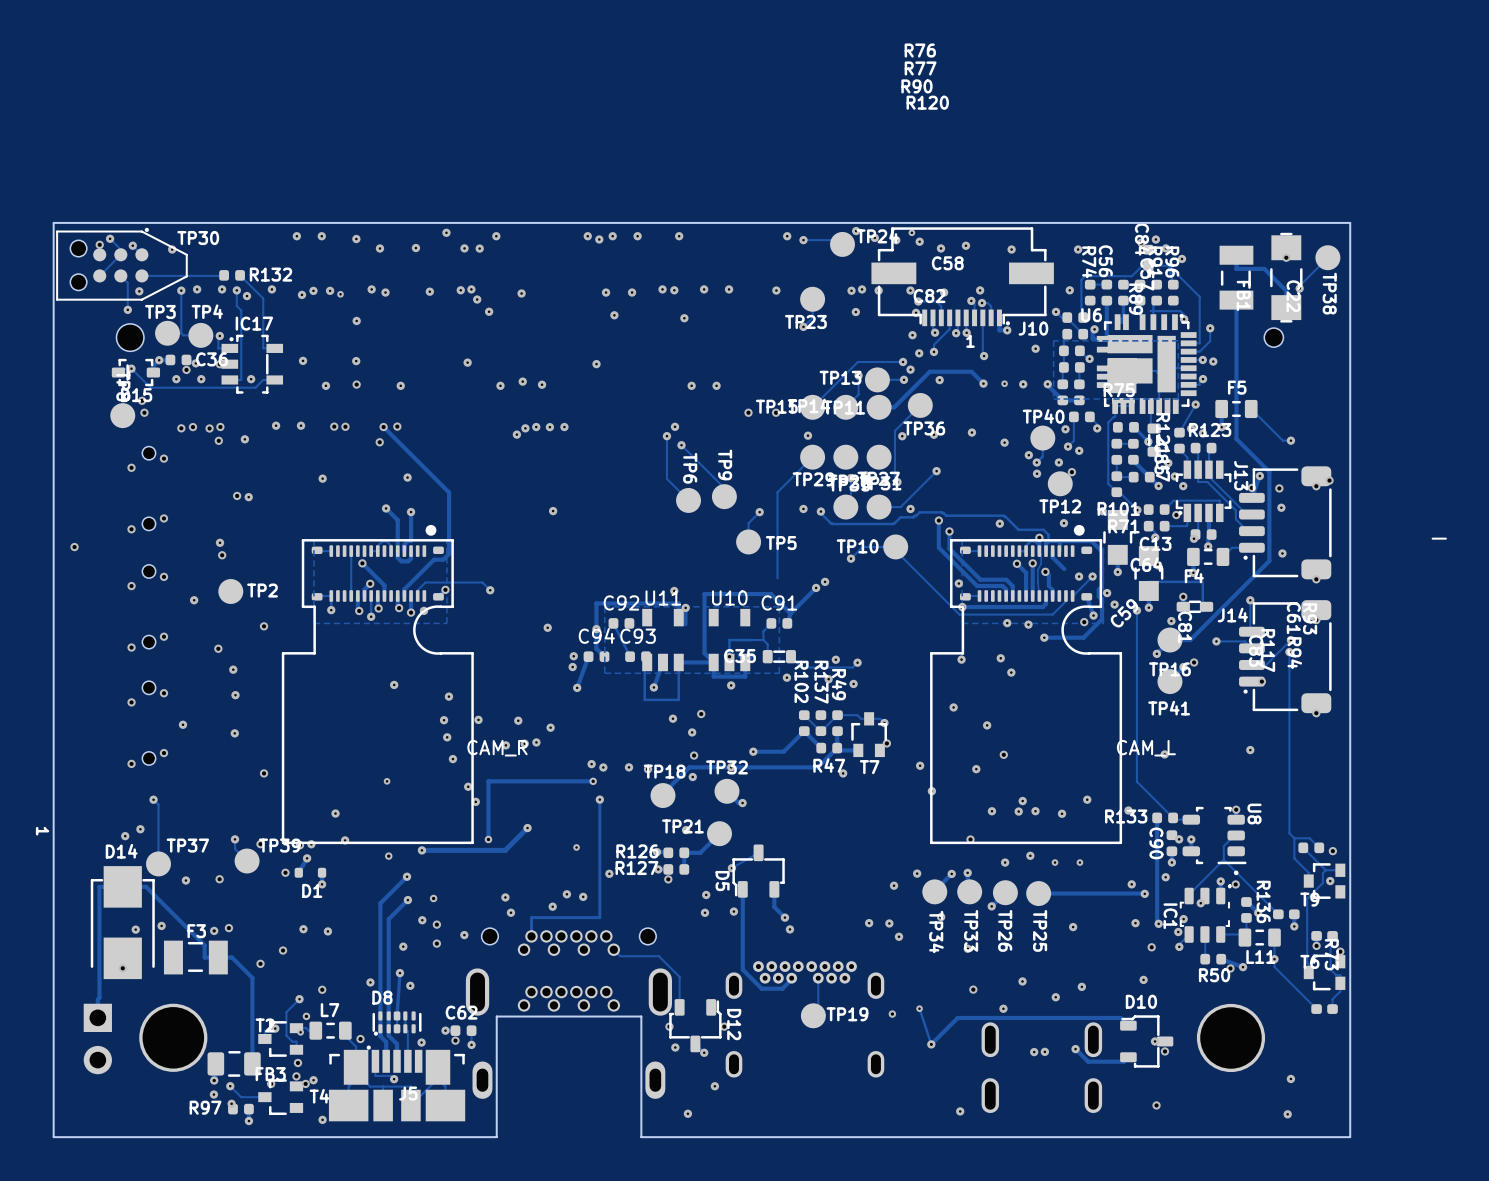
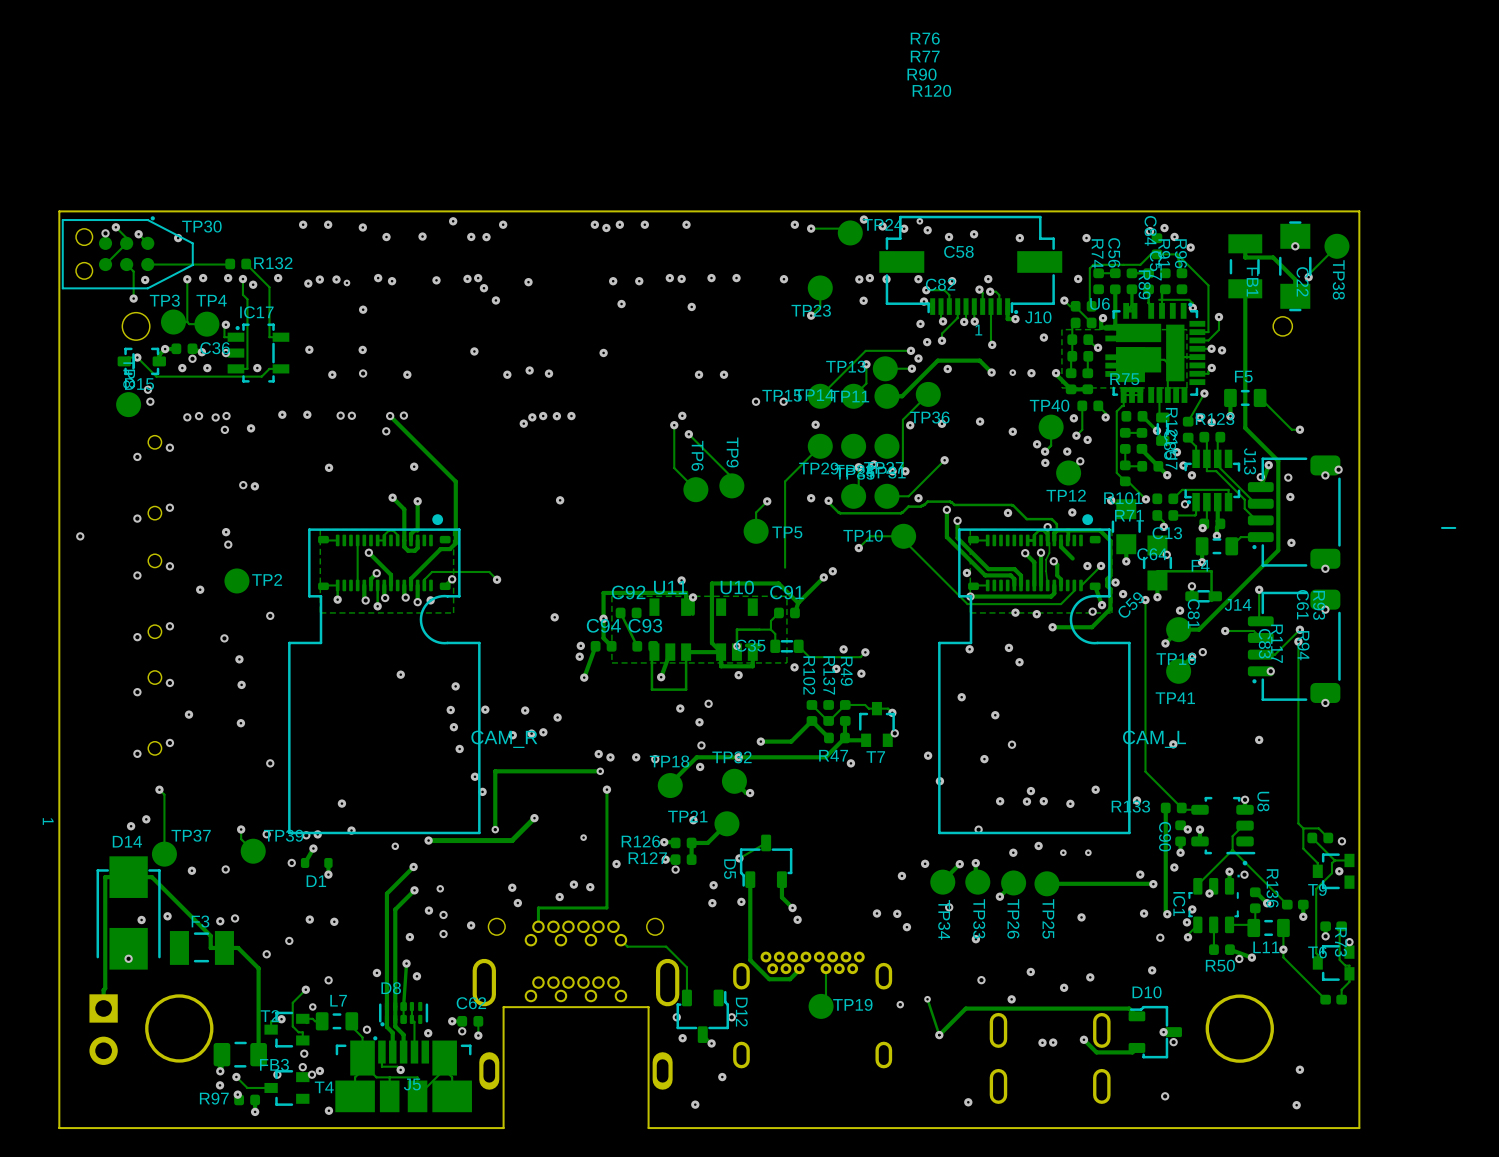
via: (387, 781) -> none
via: (300, 1032) -> none

